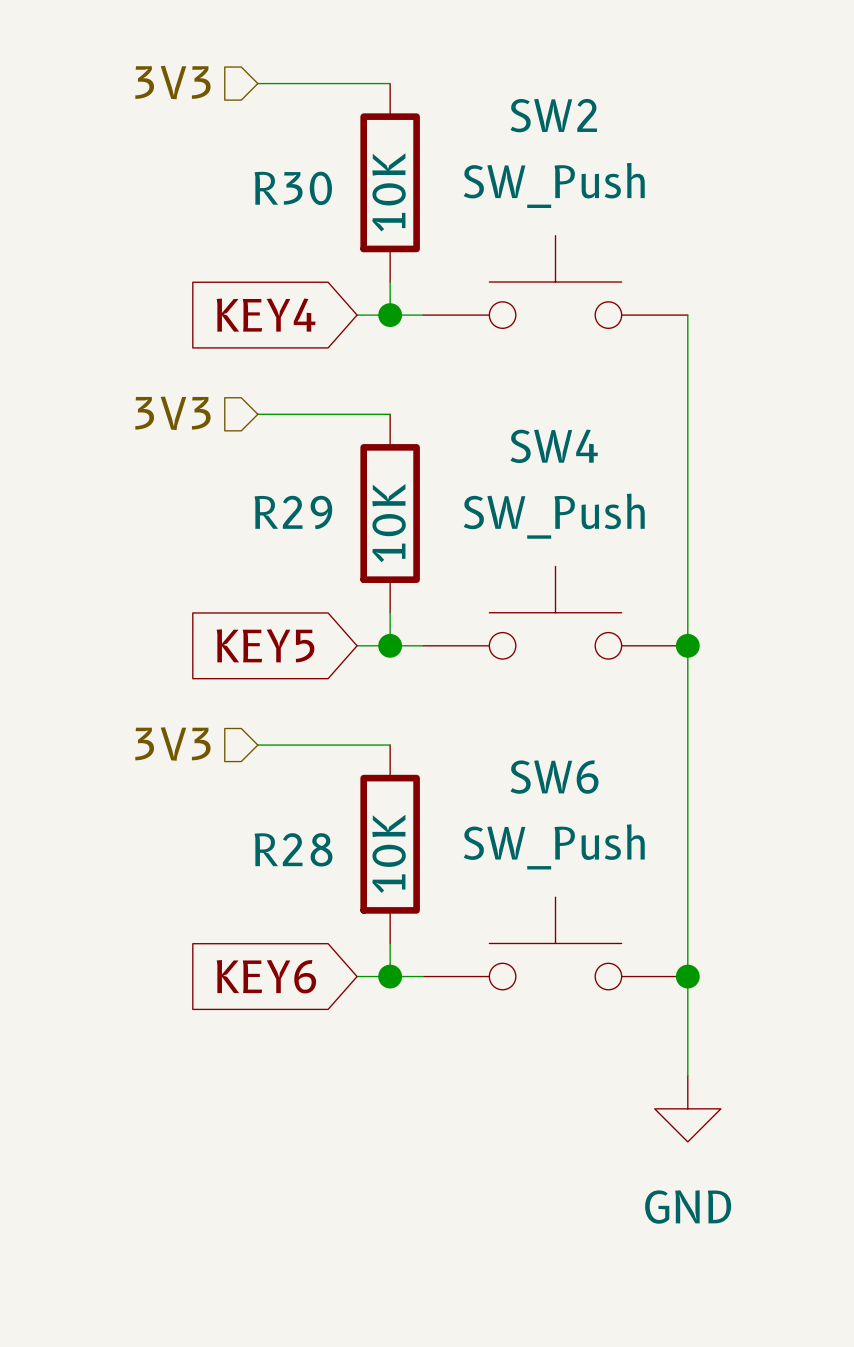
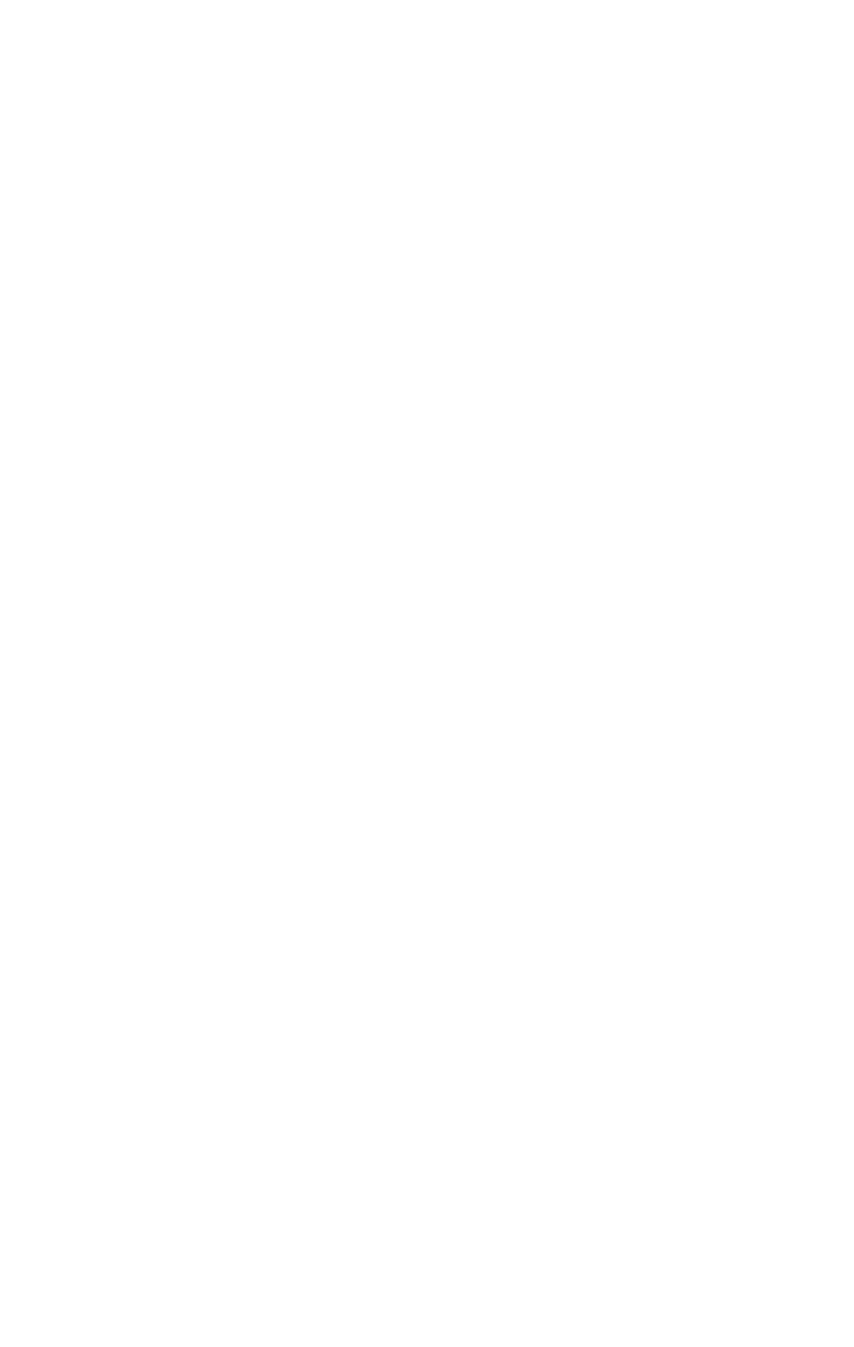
hierarchical label: 3V3 (172, 82) -> none
wire: (257, 83) (390, 83) -> none
R30: 10K (390, 182) -> none
wire: (390, 282) (390, 315) -> none
SW2: SW_Push (555, 282) -> none
global label: KEY4 (266, 315) -> none
wire: (357, 315) (423, 315) -> none
junction: (390, 315) -> none
wire: (687, 315) (687, 1075) -> none
hierarchical label: 3V3 (172, 413) -> none
wire: (257, 414) (390, 414) -> none
R29: 10K (390, 513) -> none
wire: (390, 612) (390, 645) -> none
SW4: SW_Push (555, 612) -> none
global label: KEY5 (265, 645) -> none
wire: (357, 645) (423, 645) -> none
junction: (390, 645) -> none
junction: (687, 645) -> none
hierarchical label: 3V3 (172, 744) -> none
wire: (257, 745) (390, 745) -> none
R28: 10K (390, 844) -> none
wire: (390, 943) (390, 976) -> none
SW6: SW_Push (555, 943) -> none
global label: KEY6 (266, 976) -> none
wire: (357, 976) (423, 976) -> none
junction: (390, 976) -> none
junction: (687, 976) -> none
power symbol: GND (687, 1108) -> none

